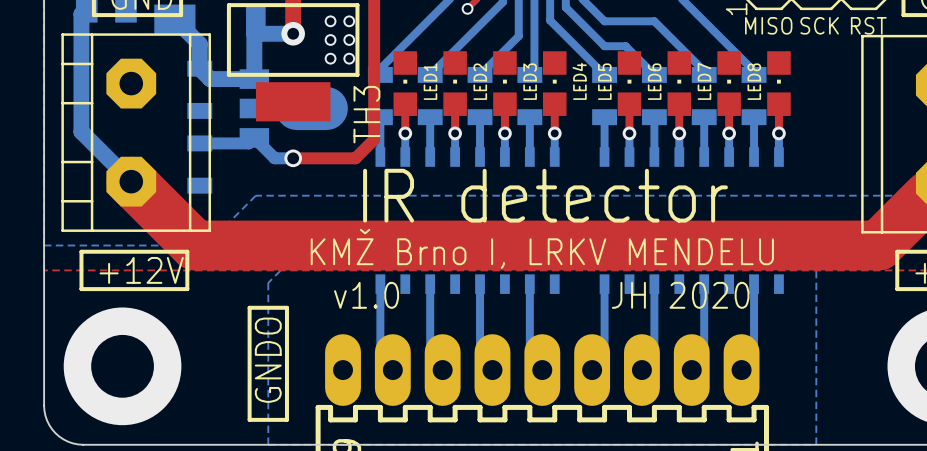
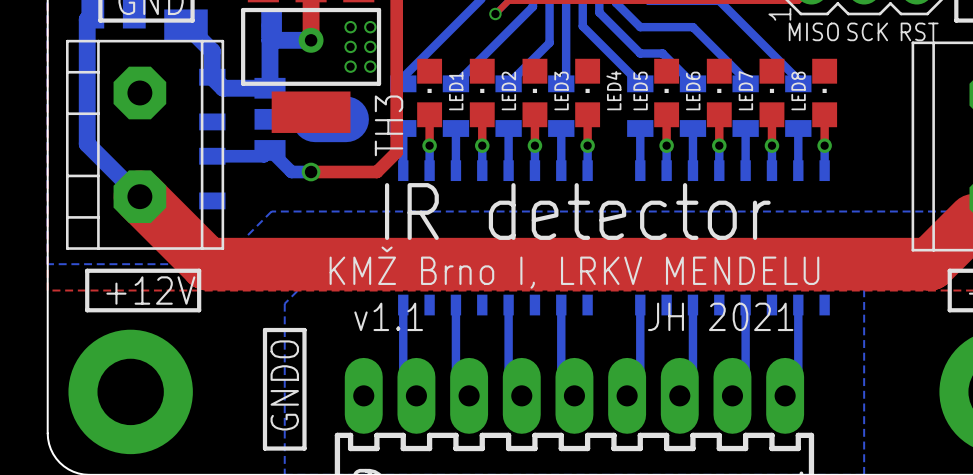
text: v1.0 (366, 295) -> v1.1 (388, 316)
text: JH 2020 (680, 295) -> JH 2021 (720, 316)

